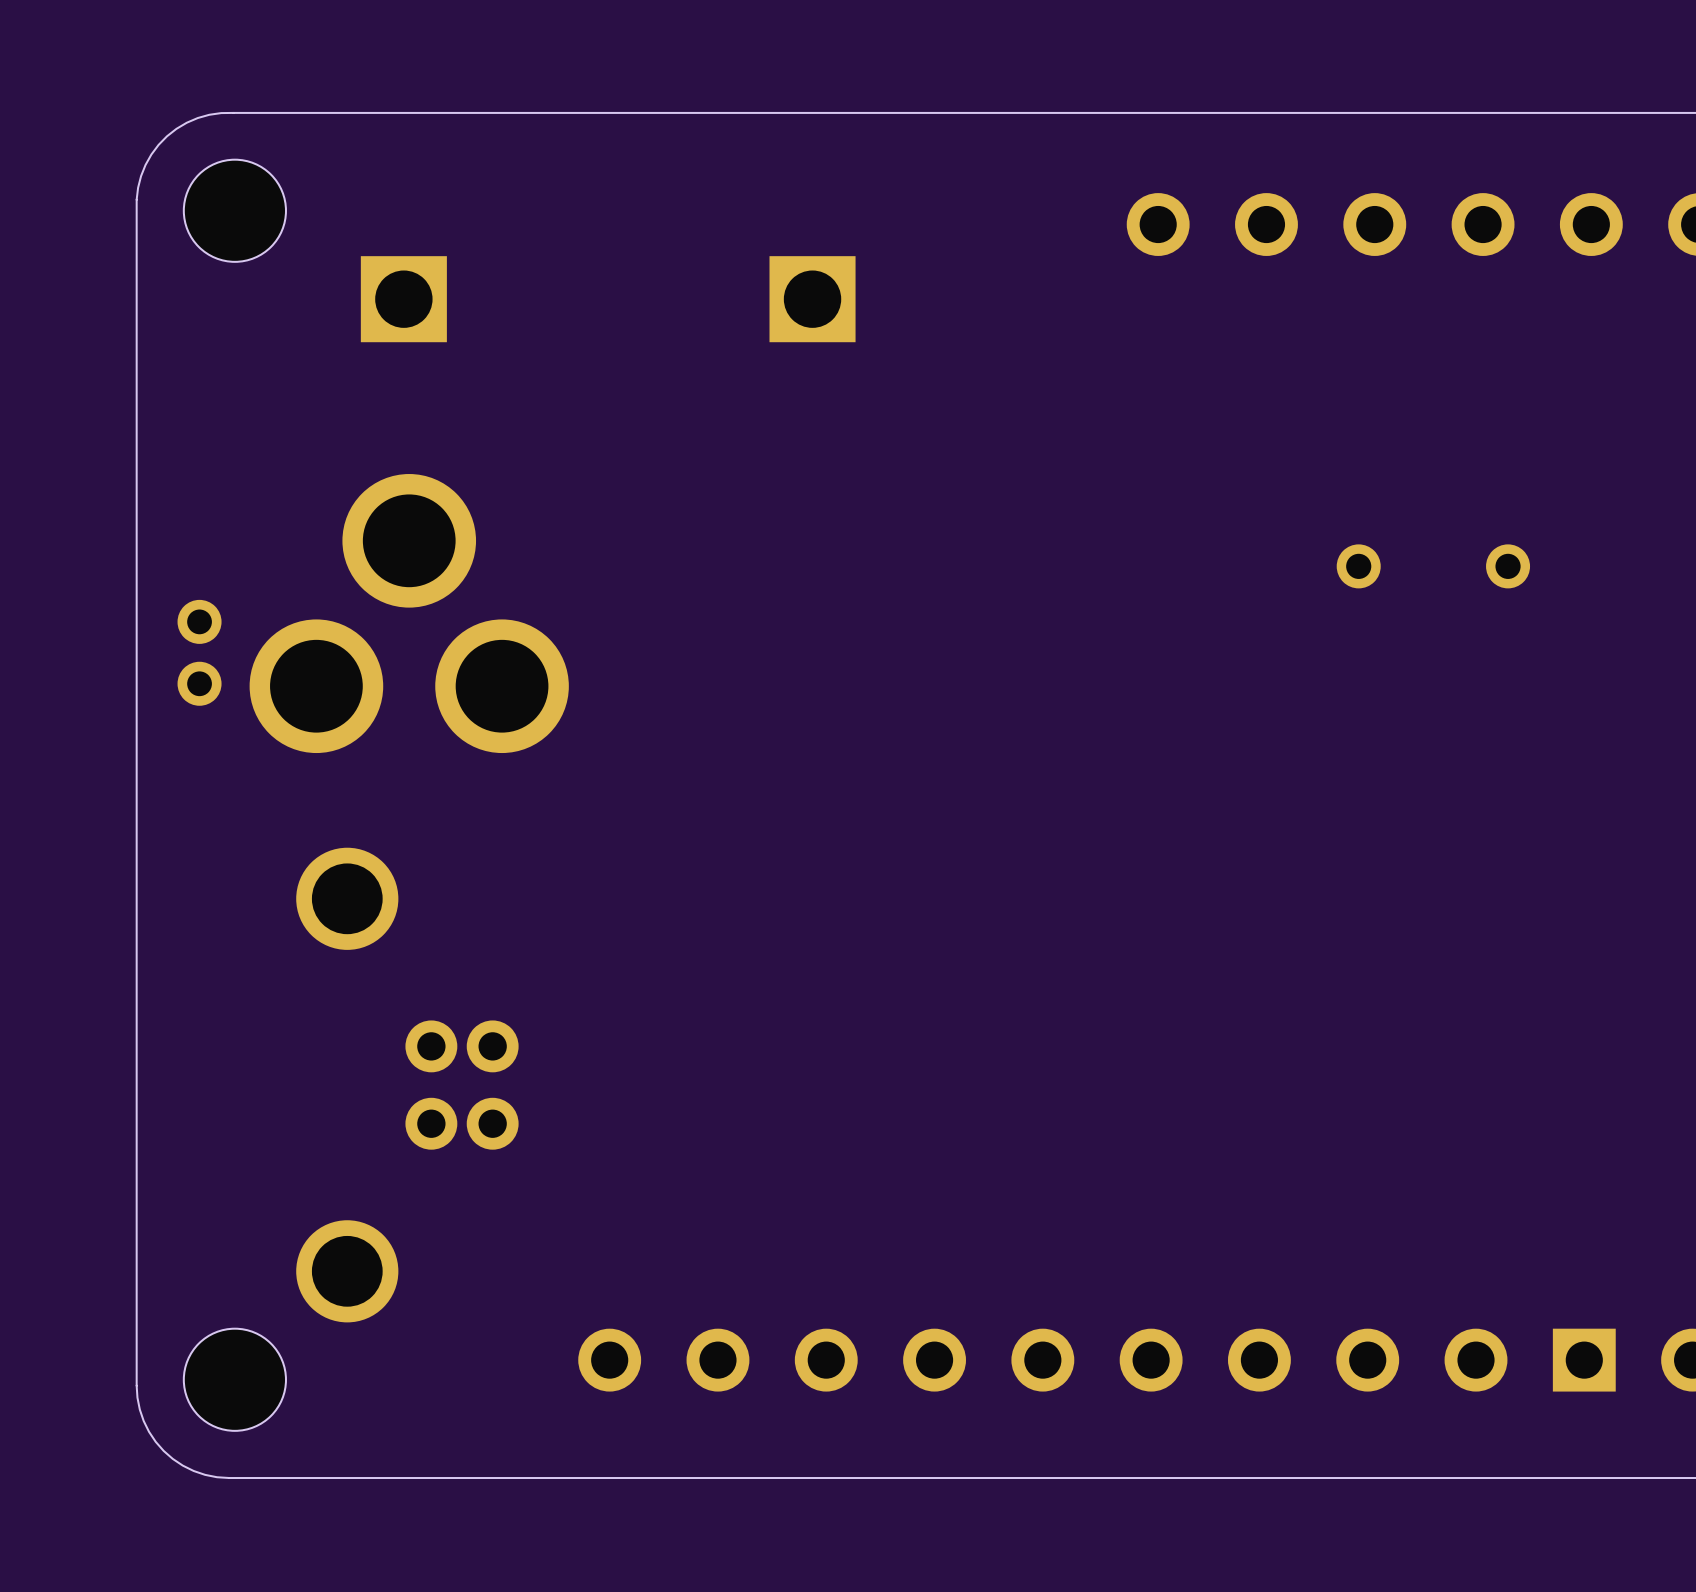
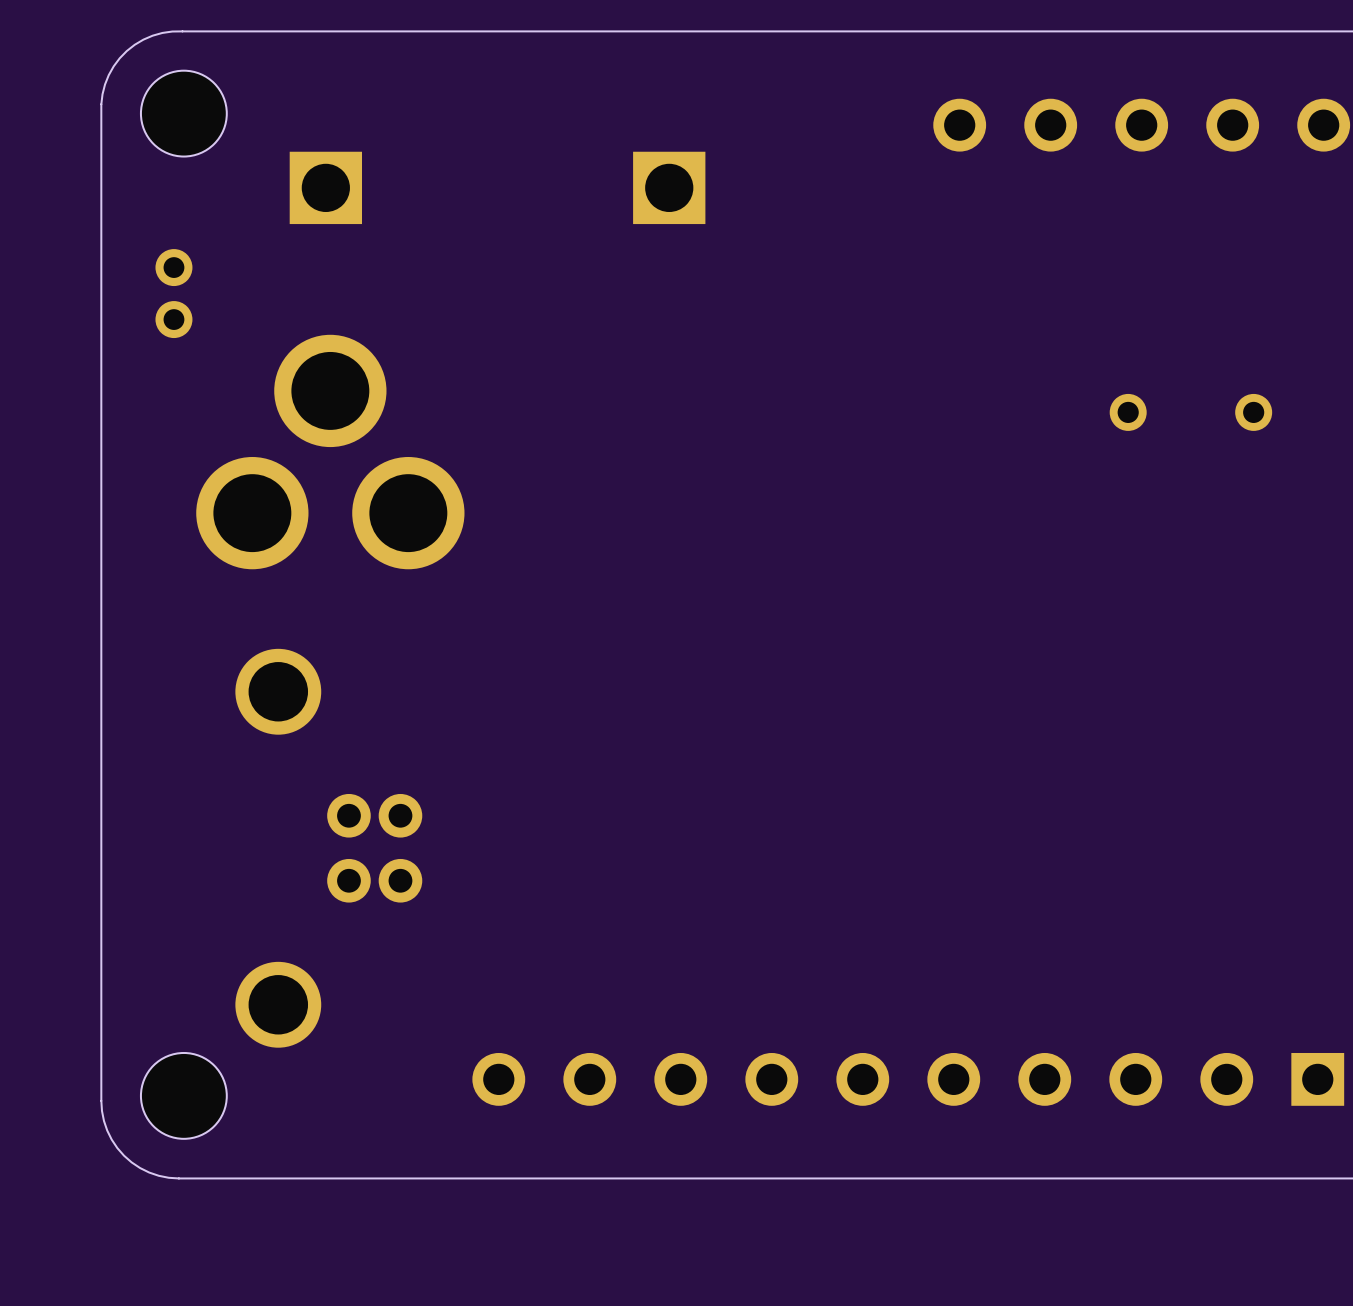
part position: (199, 652) -> (173, 293)

